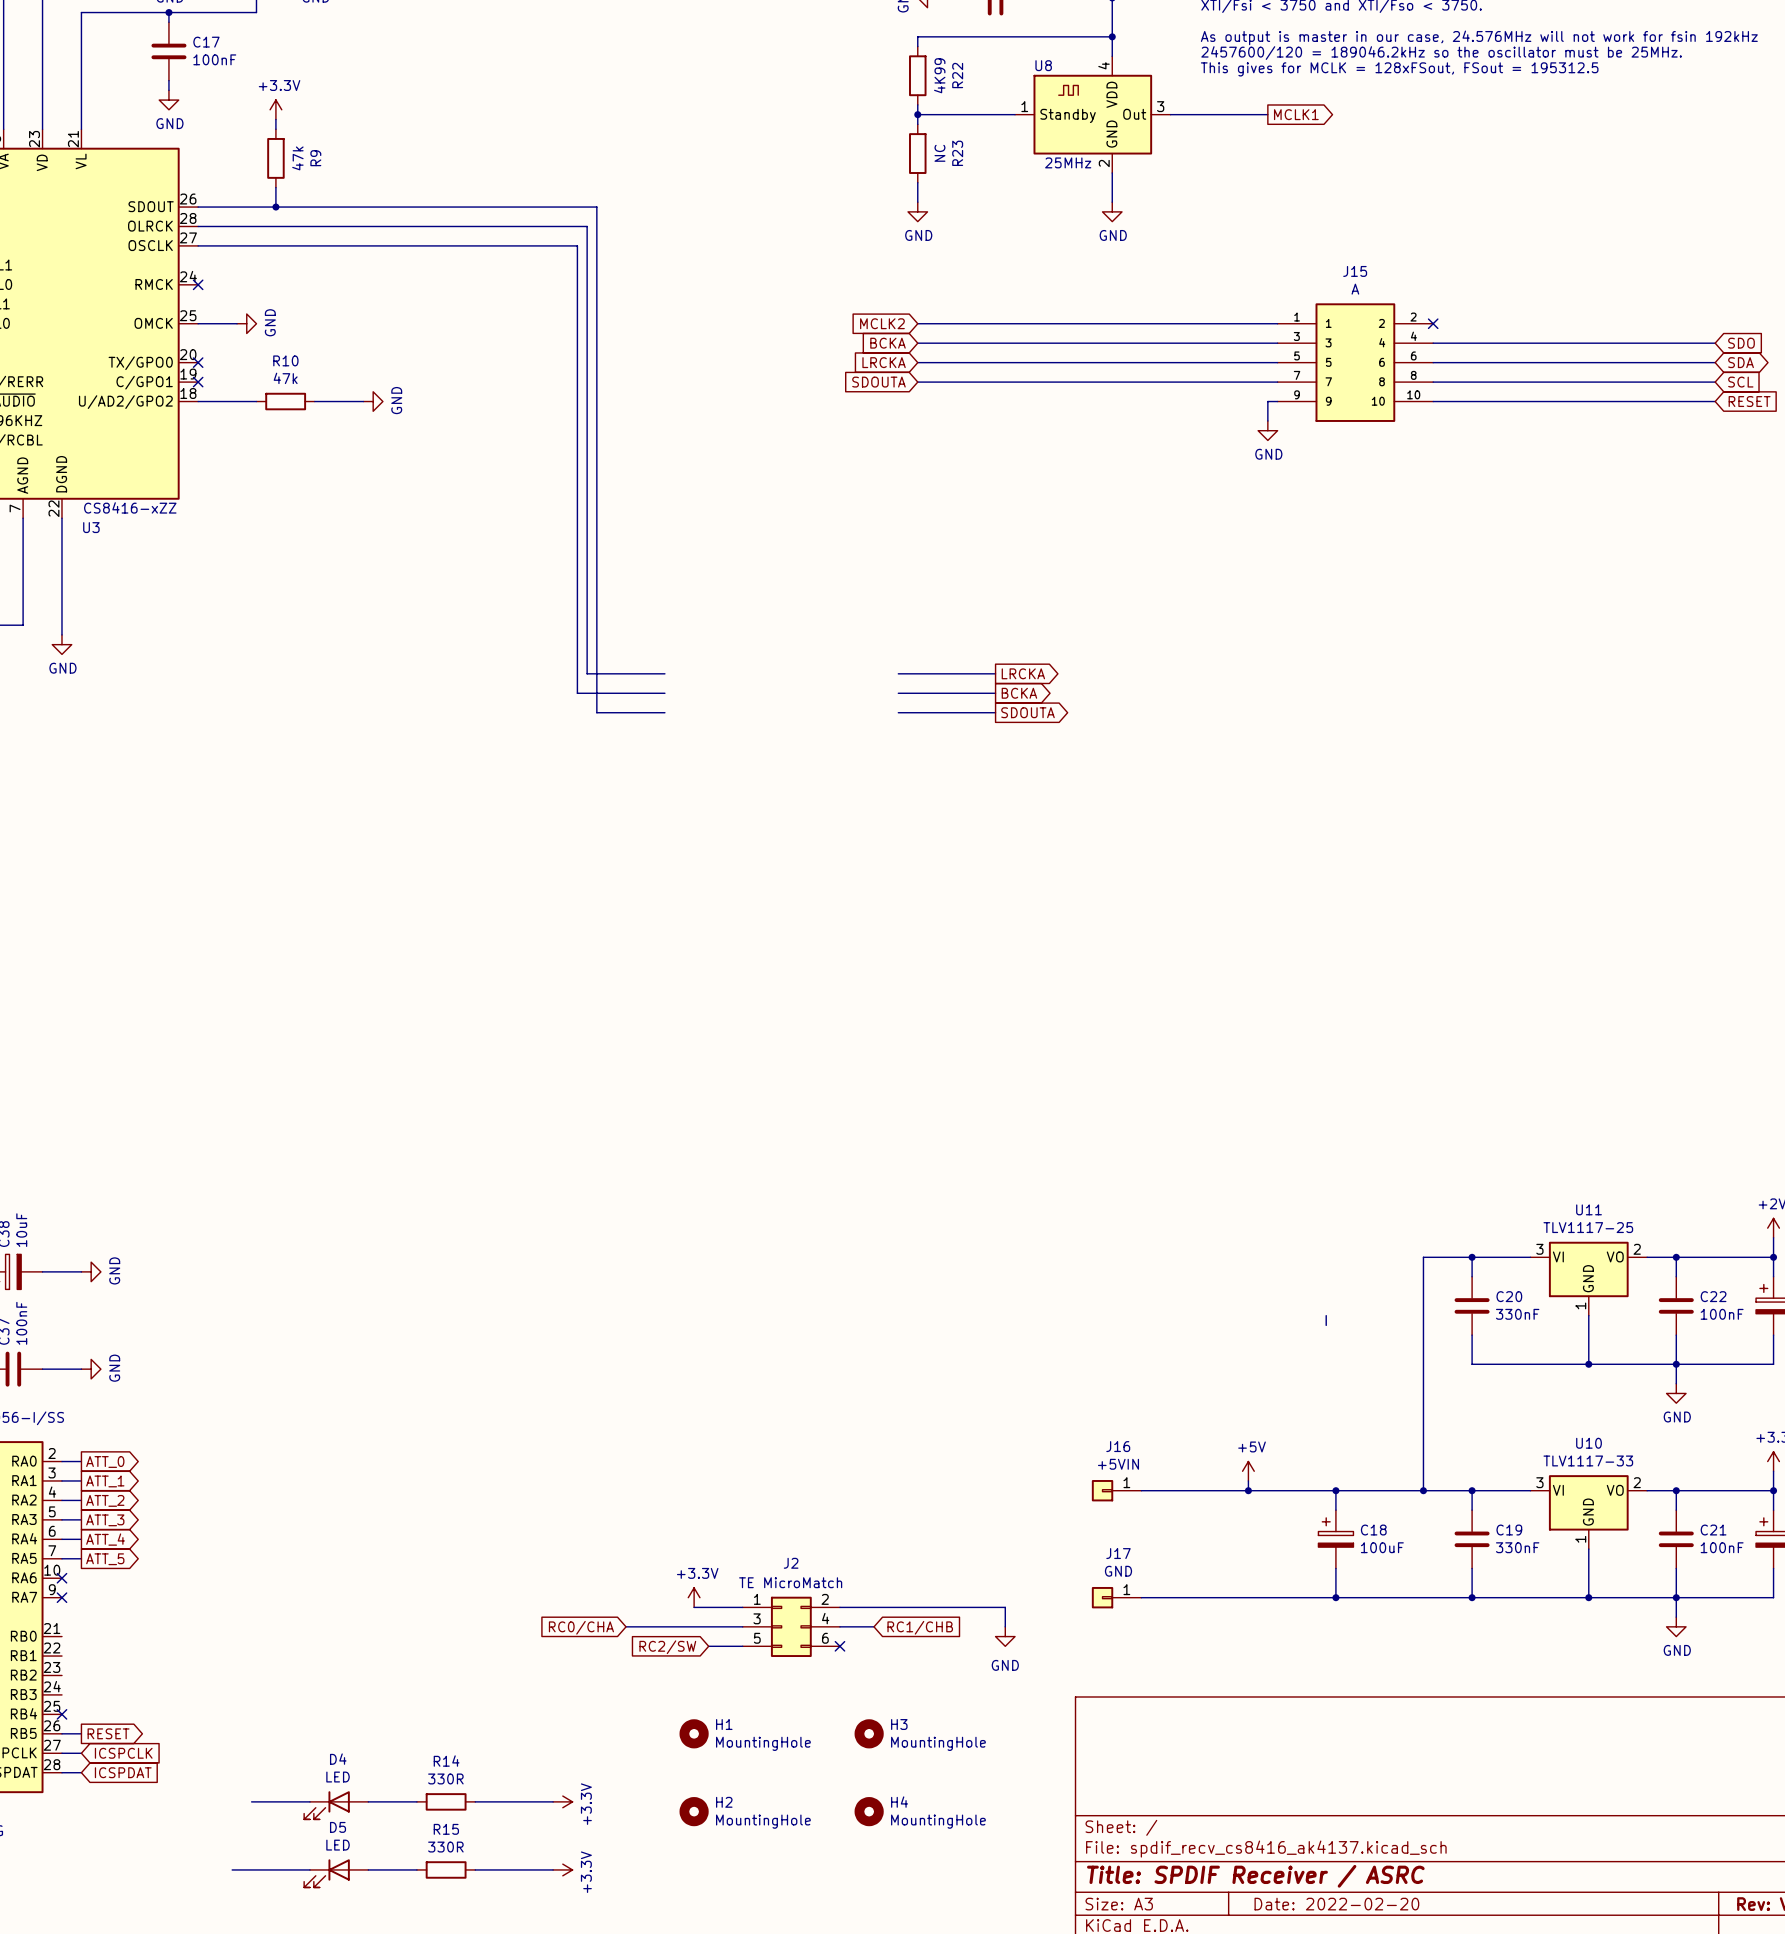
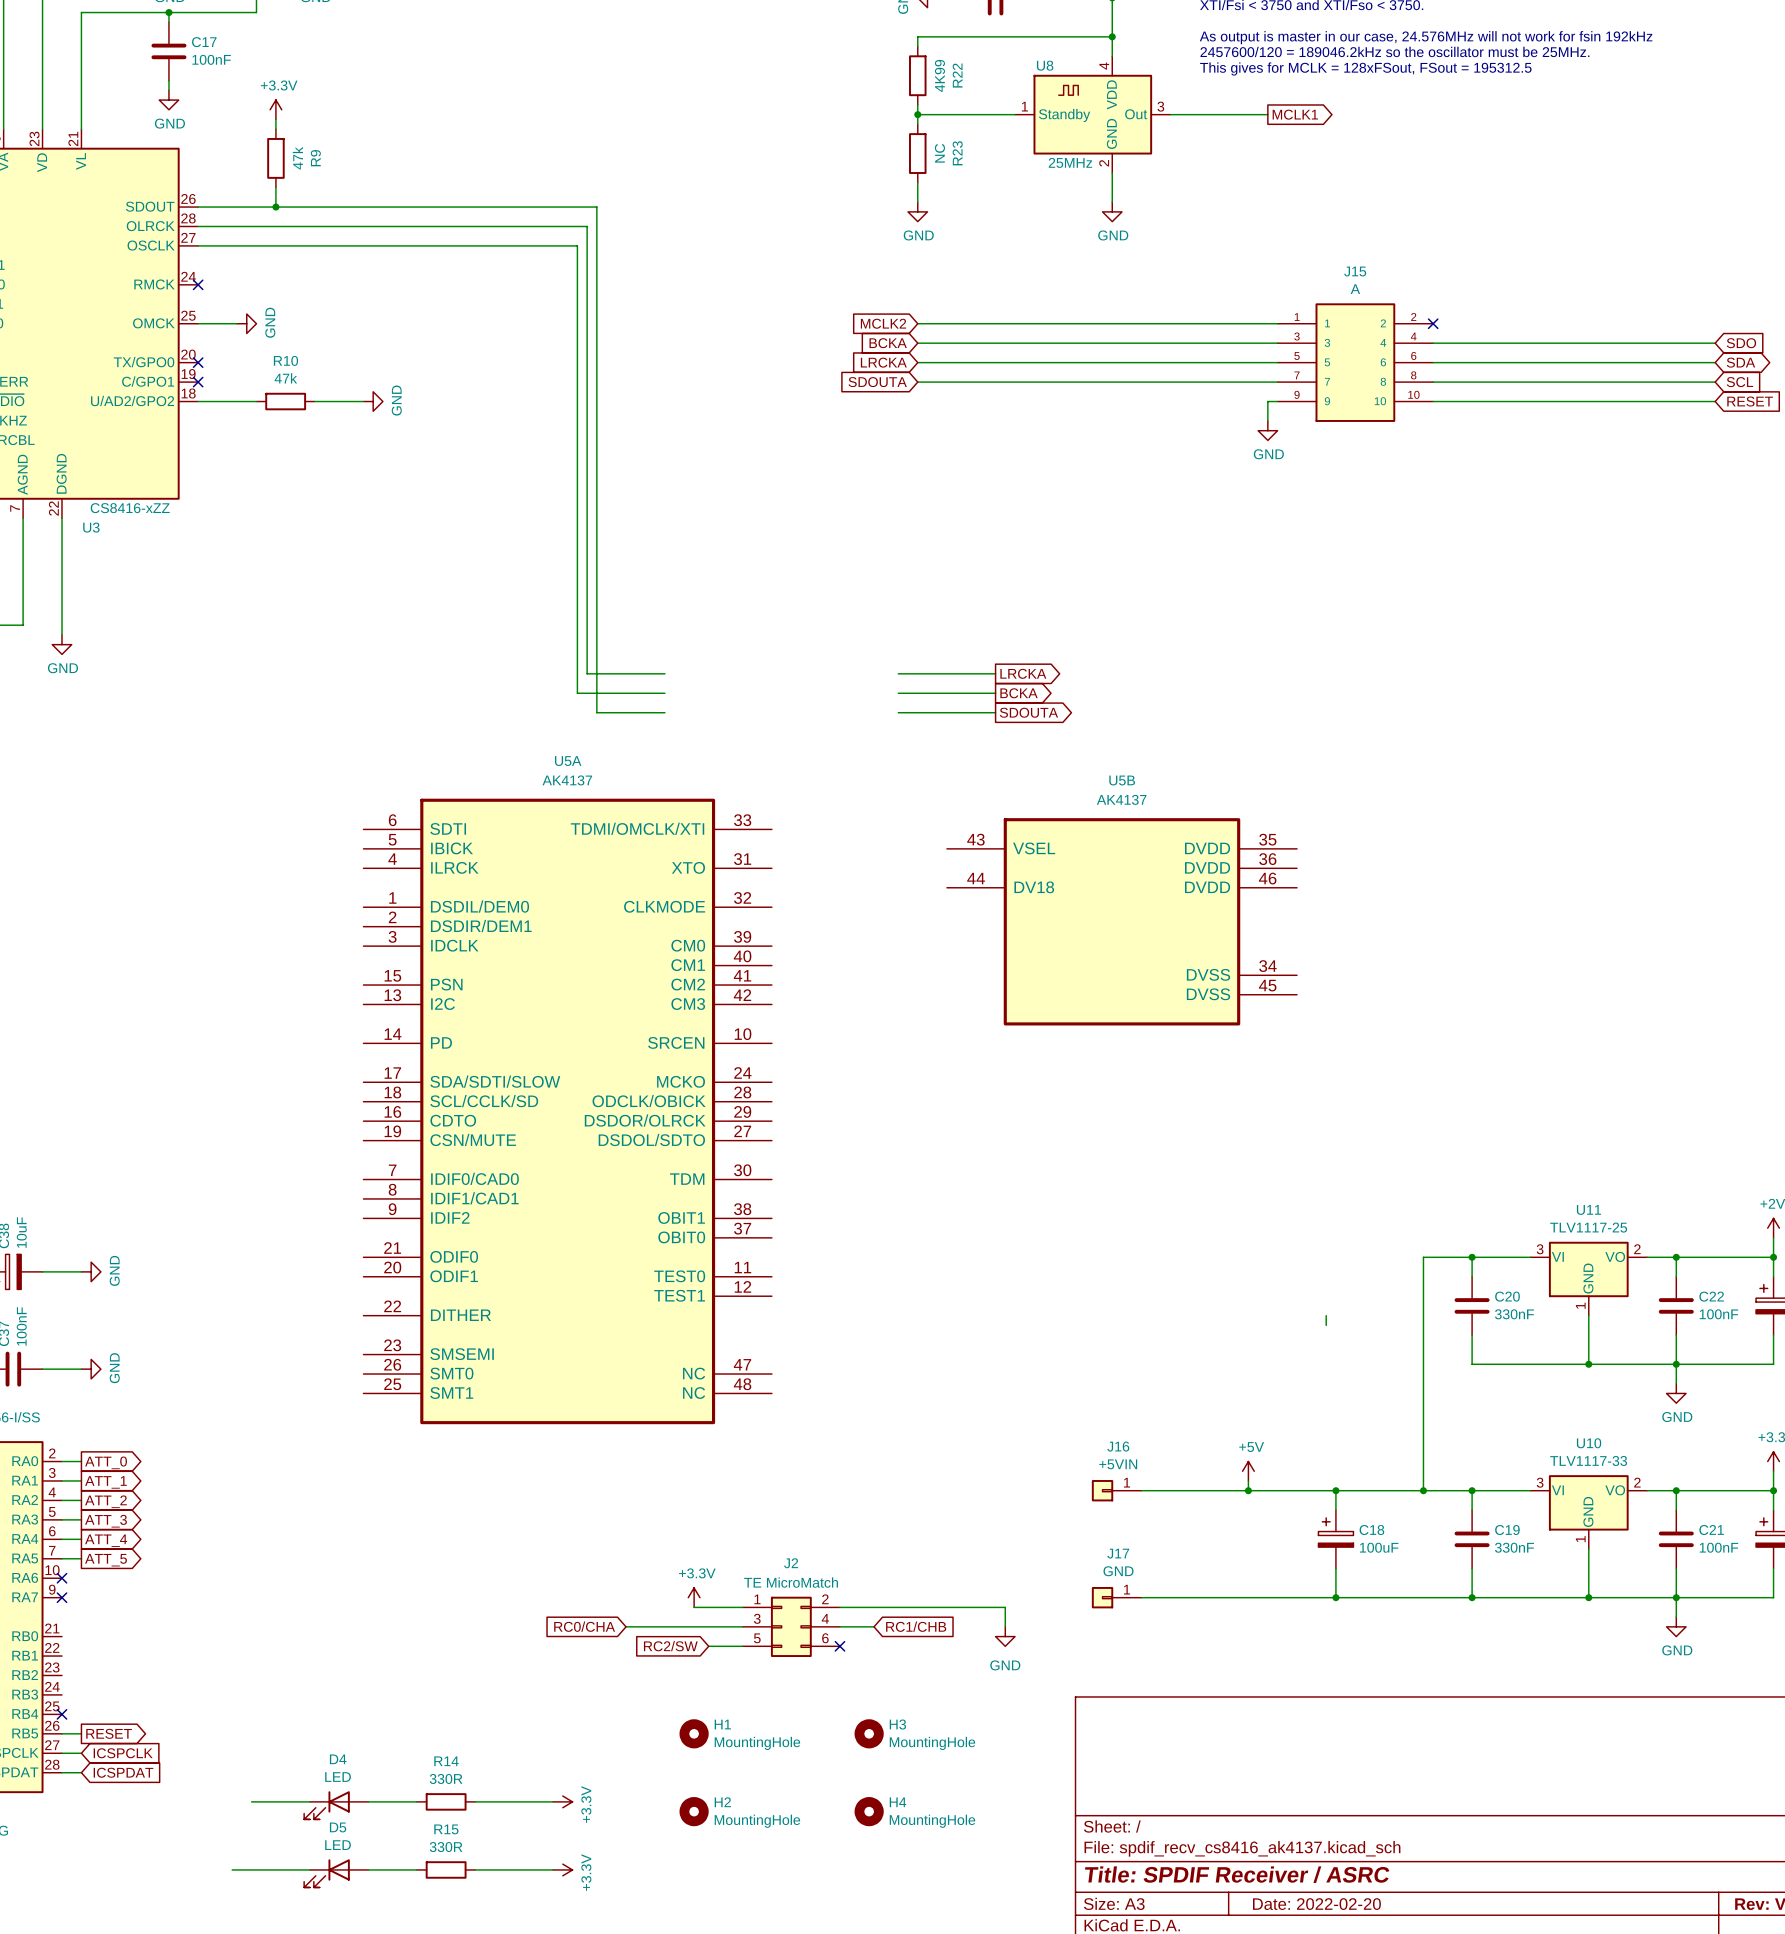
U5B: none -> AK4137 (1121, 921)
U5A: none -> AK4137 (567, 1111)

